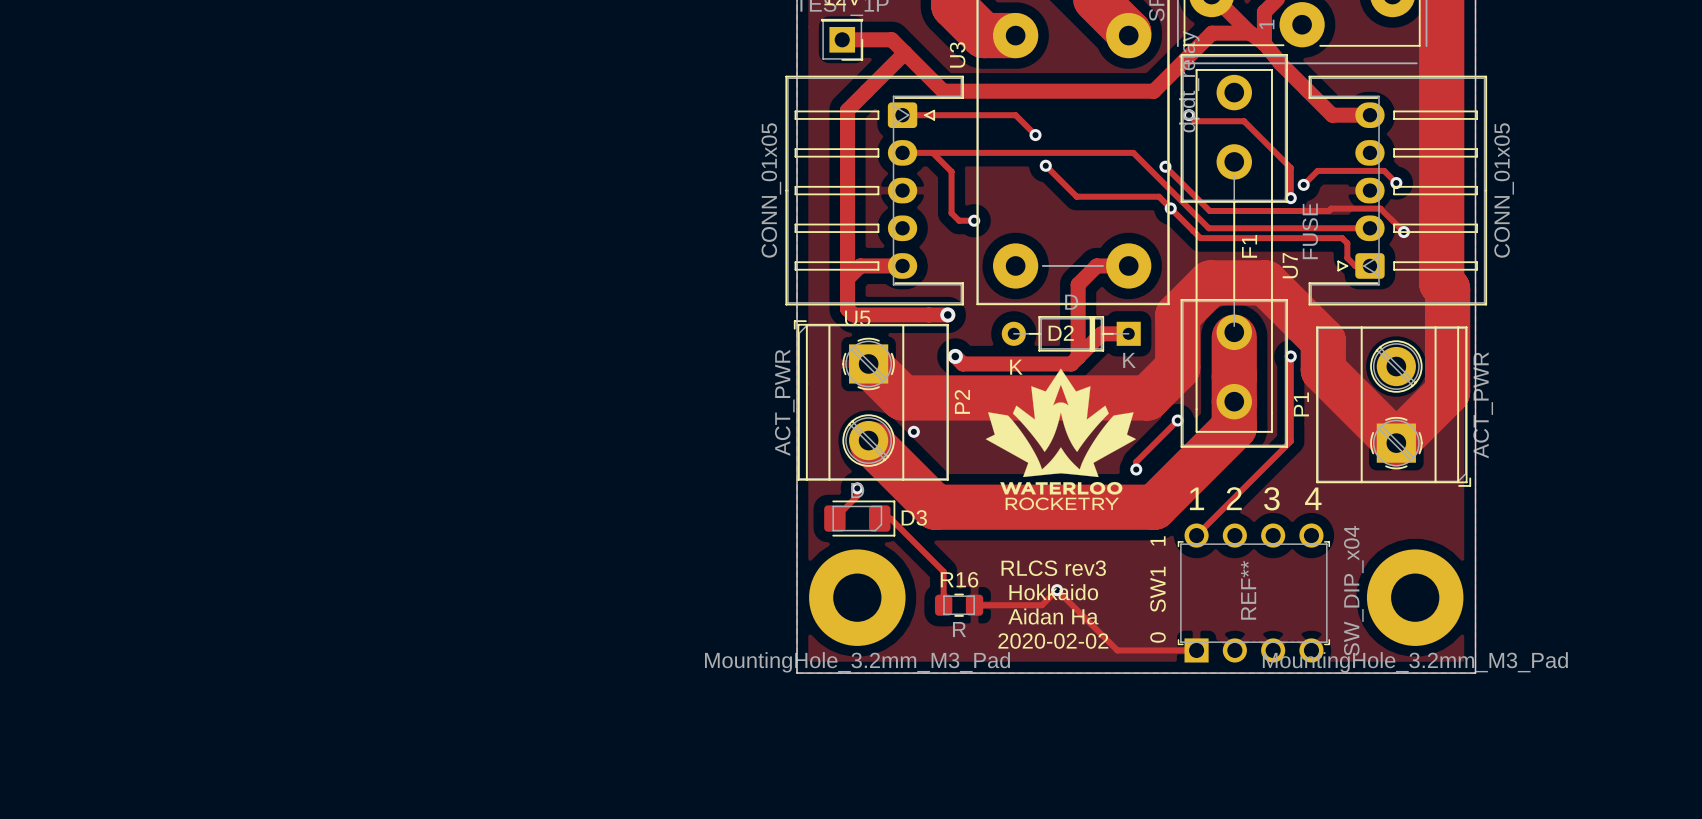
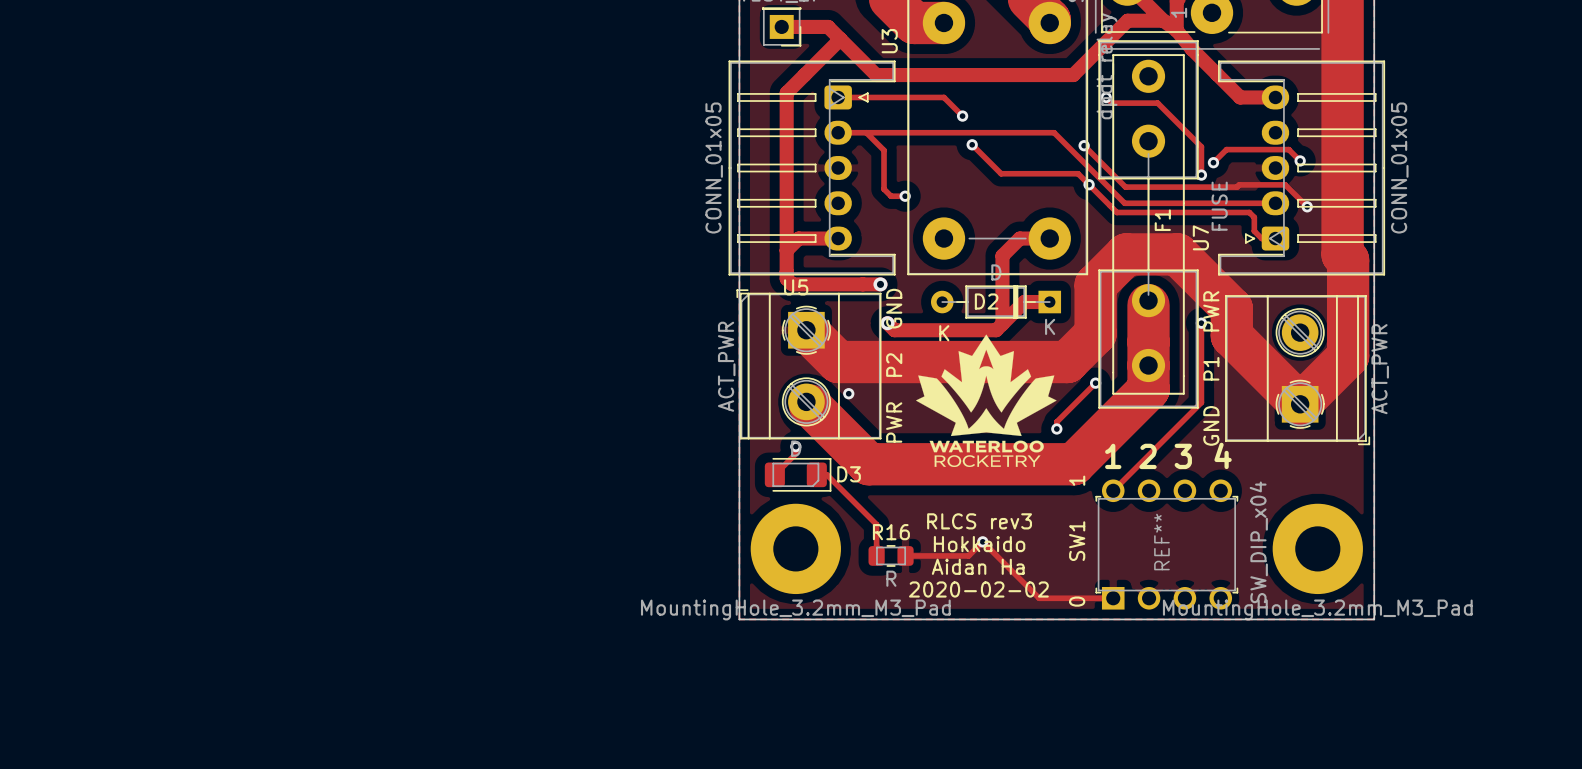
P2 name: P2 (962, 401) -> PWR P2 GND (894, 365)
P1 name: P1 (1301, 404) -> GND P1 PWR (1211, 368)

